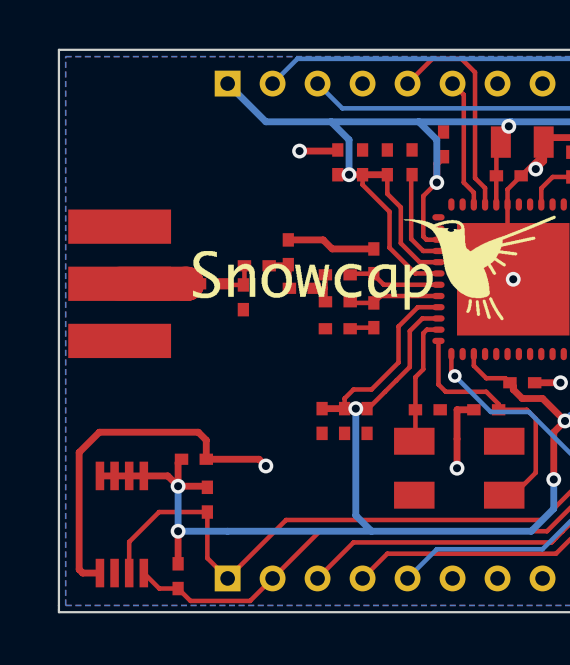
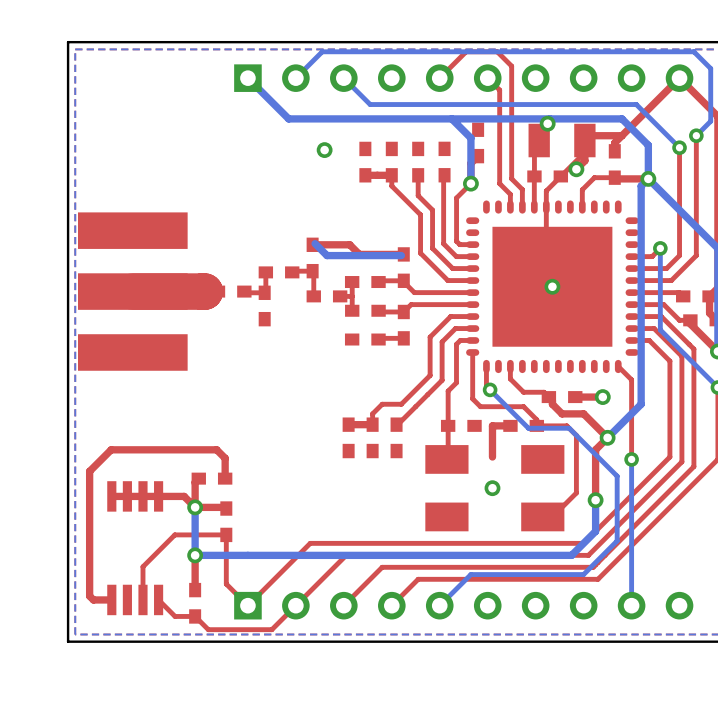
bottom track: (331, 121) (349, 139) (349, 174) -> none
top track: (337, 149) (299, 151) -> none
via: (349, 174) -> none
top track: (387, 174) (362, 174) -> none
drawing: [193, 215, 556, 321] -> none
bottom track: none -> (315, 243) (327, 255) (401, 255)
bottom track: (355, 408) (355, 515) (371, 531) -> none
via: (355, 408) -> none
top track: (457, 438) (457, 468) -> none
top track: (206, 459) (259, 459) (265, 465) -> none
via: (265, 465) -> none

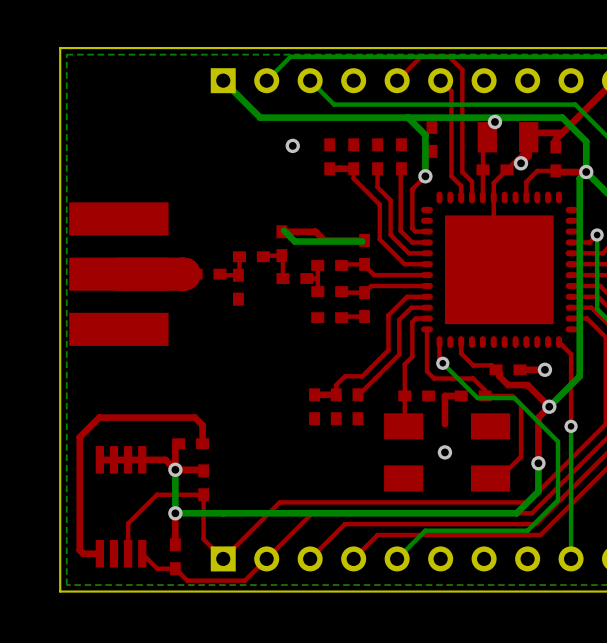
via: (552, 286) -> none

